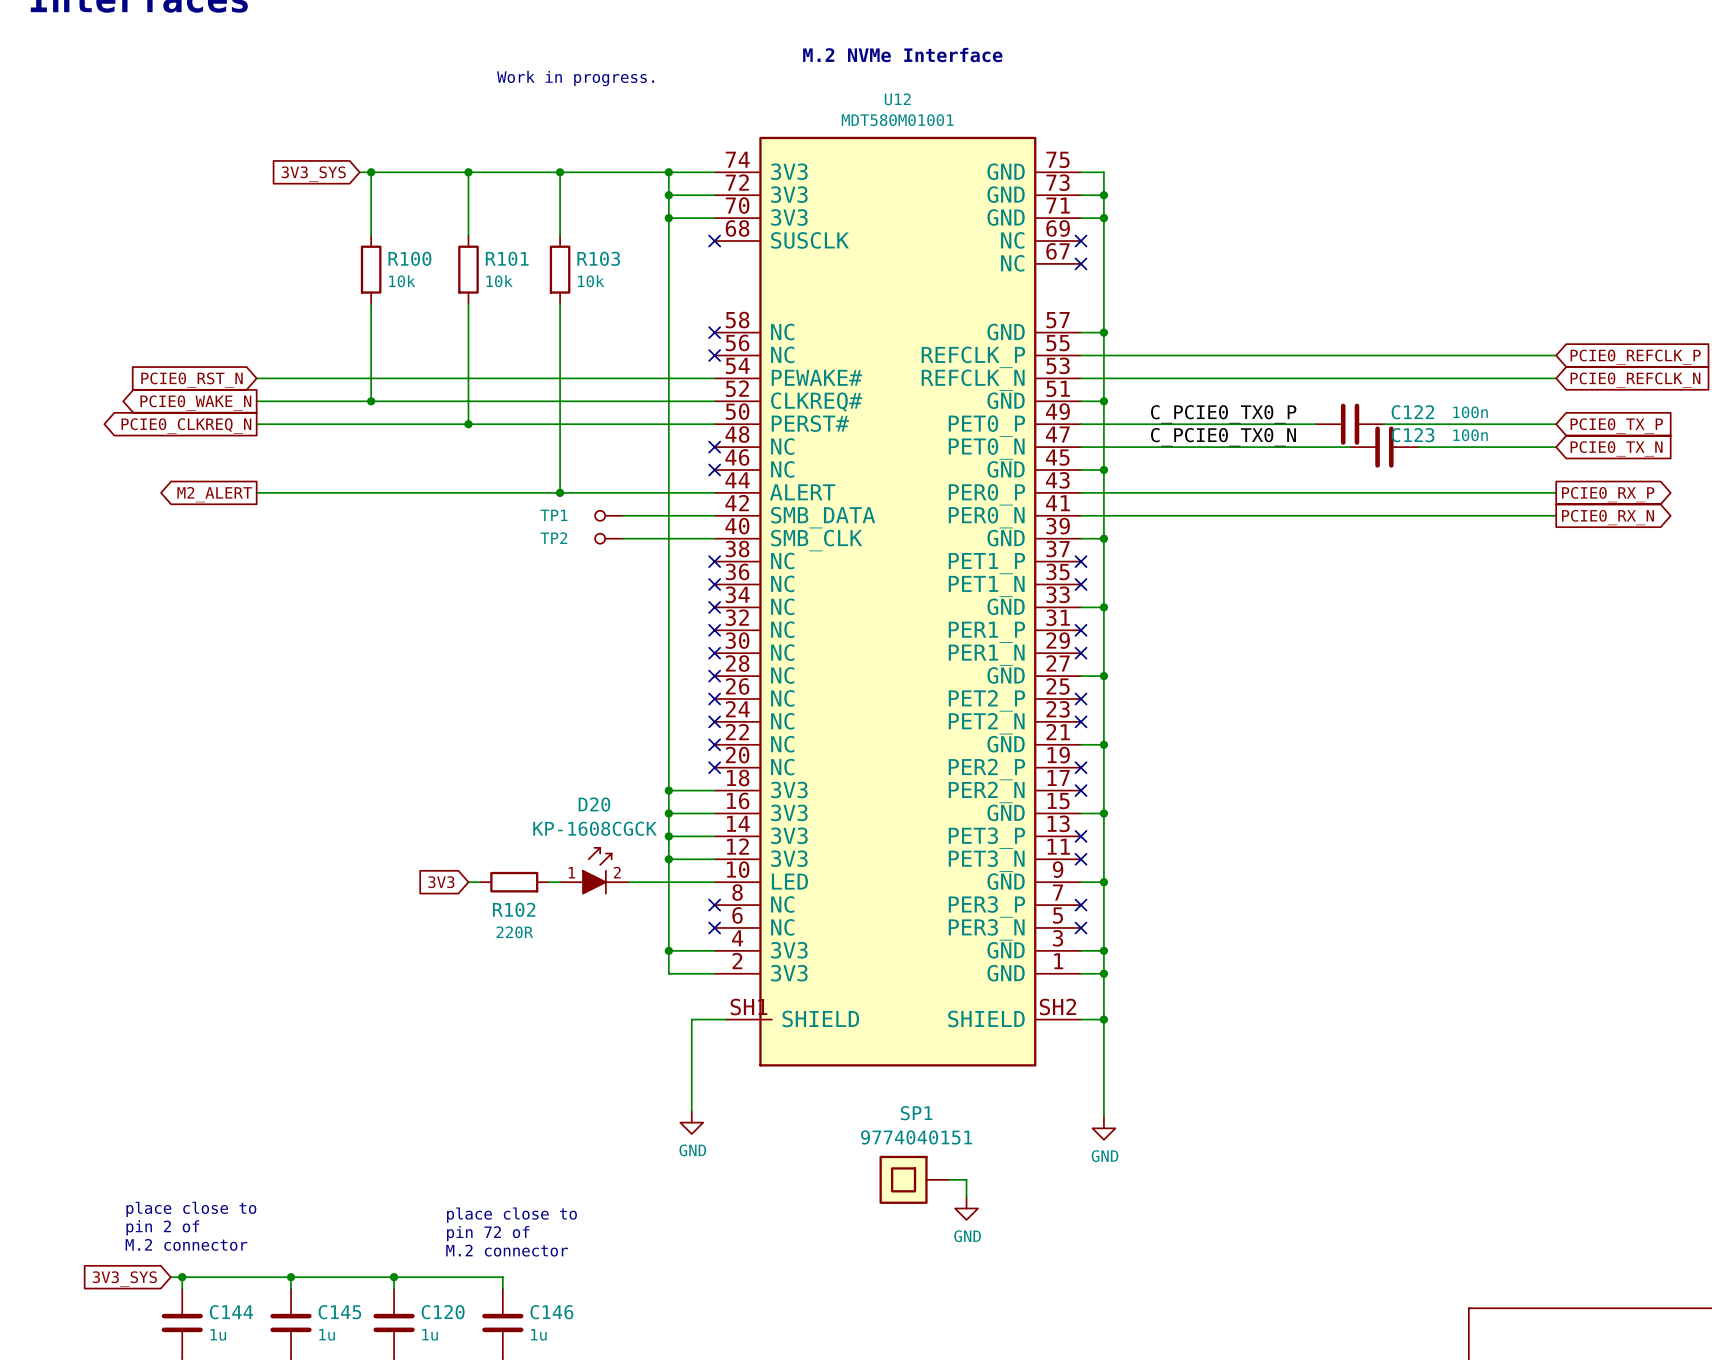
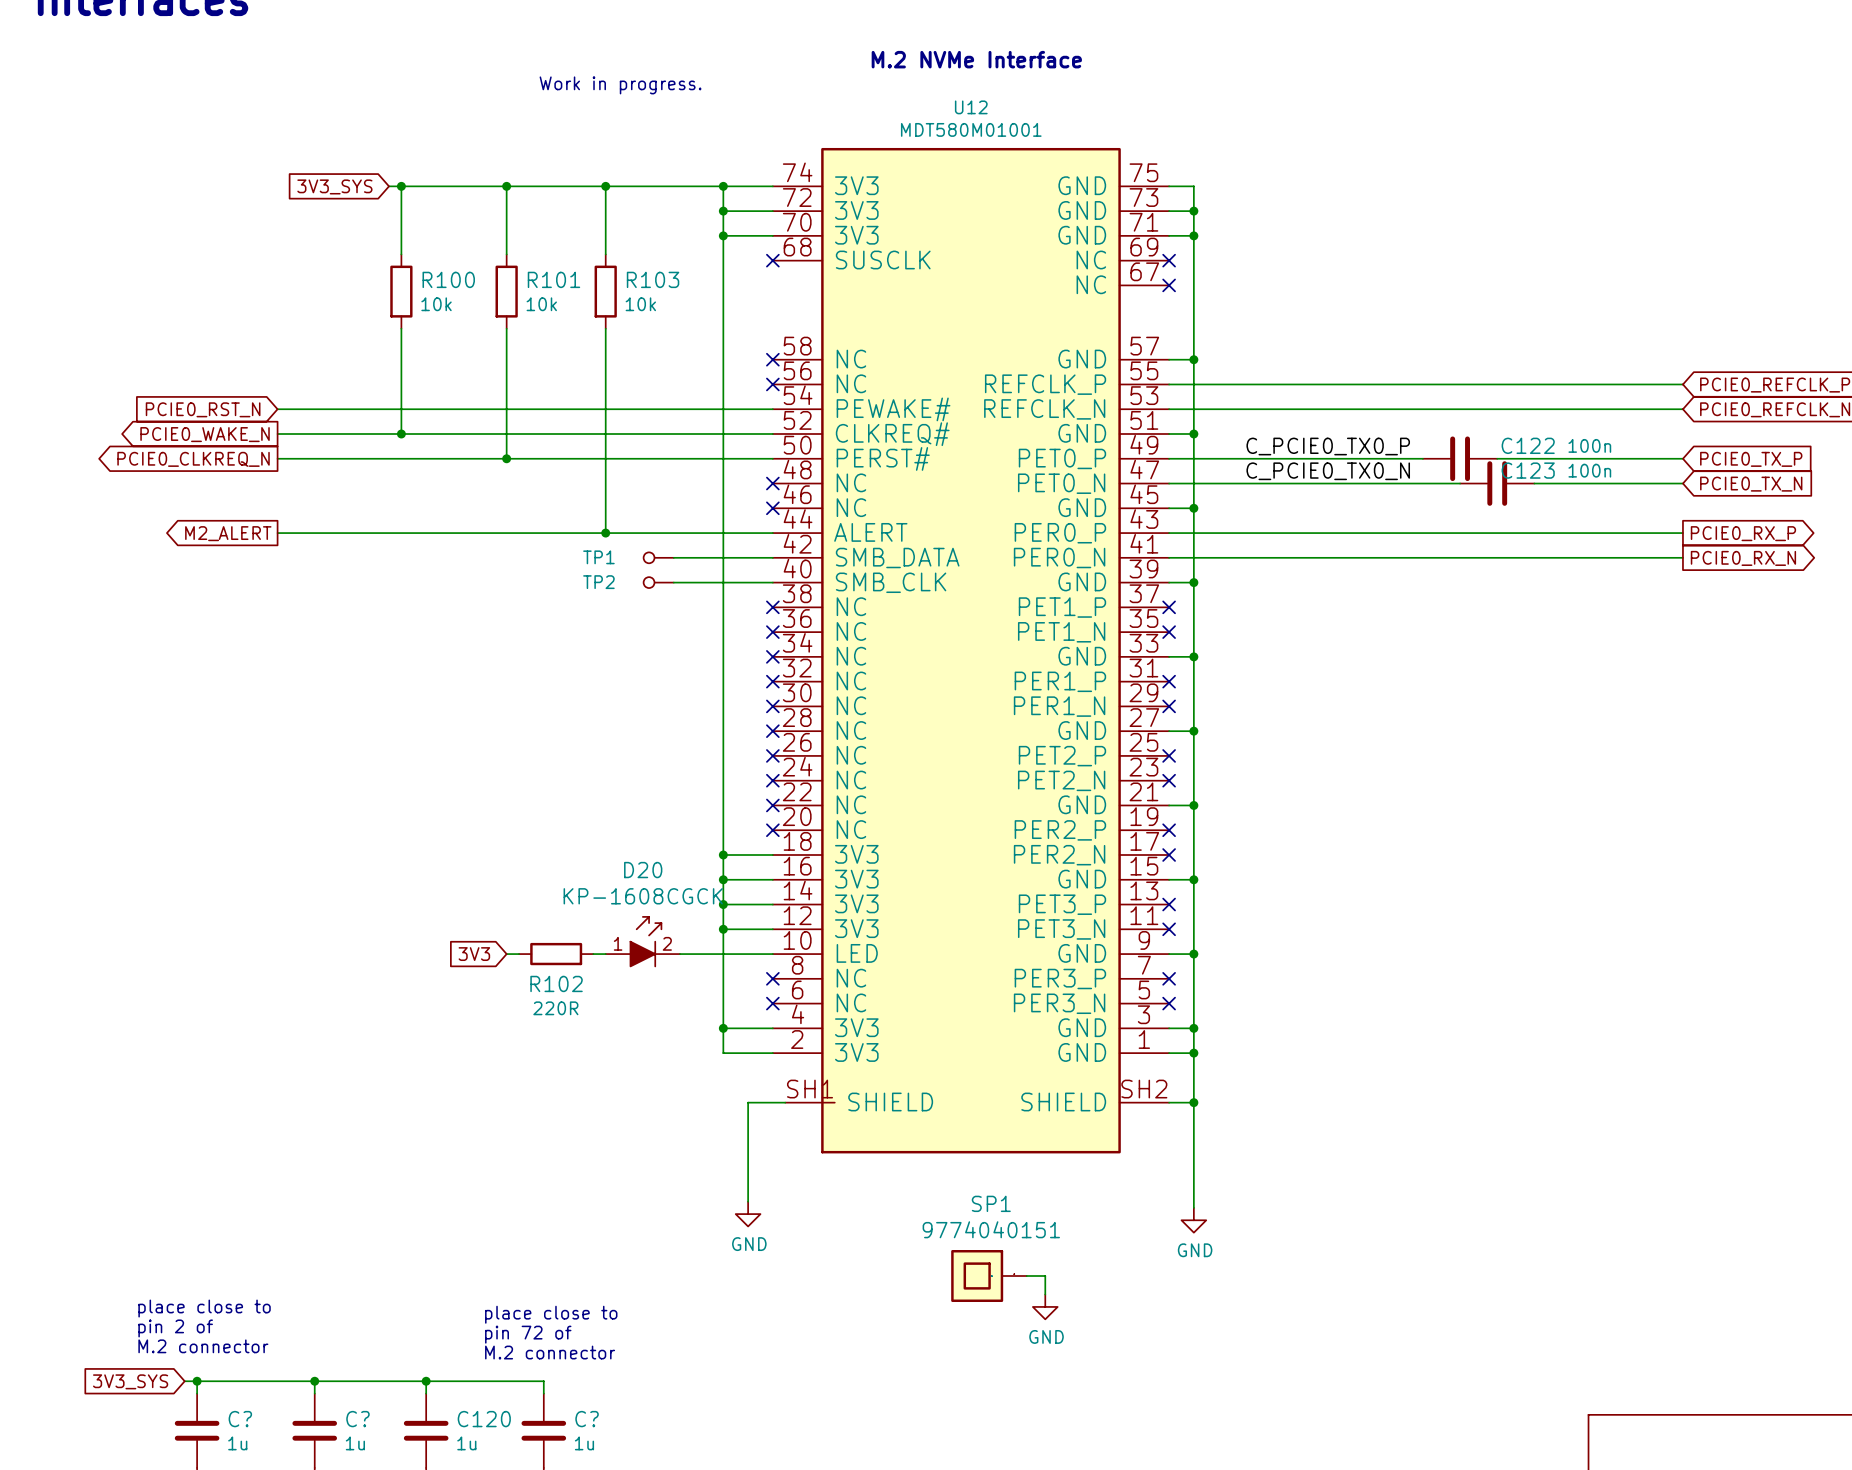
C144 name: C144 (231, 1312) -> C? (240, 1419)
C145 name: C145 (339, 1312) -> C? (357, 1419)
C146 name: C146 (551, 1312) -> C? (587, 1419)

